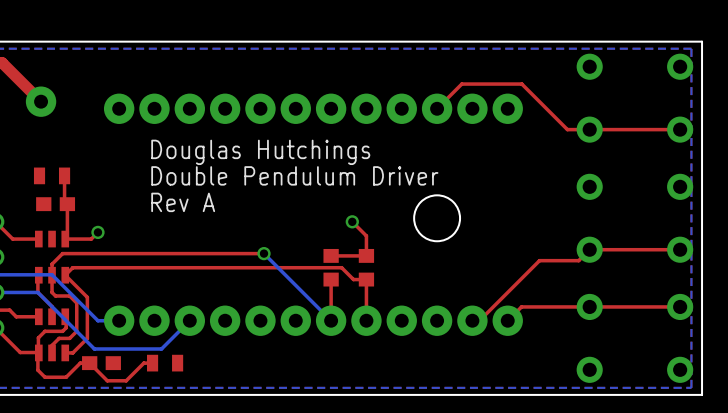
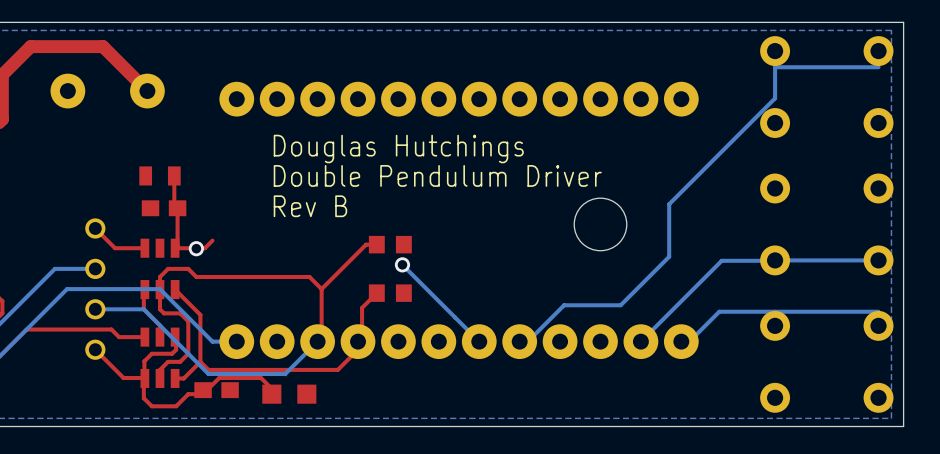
bottom track: none -> (878, 67) (775, 67) (775, 98) (669, 204) (669, 256) (620, 305) (564, 305) (523, 345)
top track: (437, 108) (461, 84) (521, 84) (567, 129) (680, 129) -> none
text: Rev A (183, 202) -> Rev B (310, 206)
top track: (352, 221) (366, 235) (366, 257) -> none
via: (352, 221) -> none
via position: (97, 232) -> (196, 248)
top track: none -> (376, 244) (366, 244) (321, 289)
part: none -> (390, 244)
top track: (680, 249) (589, 249) (578, 260) (539, 260) (479, 320) (472, 320) -> none
bottom track: none -> (878, 260) (721, 260) (644, 337) (644, 345)
top track: (263, 253) (62, 253) (59, 257) -> (321, 289) (309, 276) (196, 276) (188, 268) (168, 268)
top track: (366, 255) (331, 255) -> none
part: (331, 267) -> none
part: (366, 267) -> none
top track: none -> (321, 289) (321, 345)
top track: (65, 275) (72, 267) (341, 267) (353, 279) (366, 279) (366, 320) -> none
top track: none -> (376, 293) (362, 307) (362, 345) (337, 369) (208, 369) (200, 361)
part: none -> (390, 293)
top track: (331, 279) (331, 320) -> none
bottom track: none -> (878, 311) (719, 311) (685, 345)
top track: (680, 306) (521, 306) (507, 320) -> none
part footprint: [147, 354, 184, 372] -> [262, 384, 317, 404]
top track: (152, 363) (143, 363) (126, 380) (107, 380) (89, 363) (80, 363) (76, 366) -> (271, 394) (271, 388) (261, 378) (219, 378) (203, 394) (188, 394)

